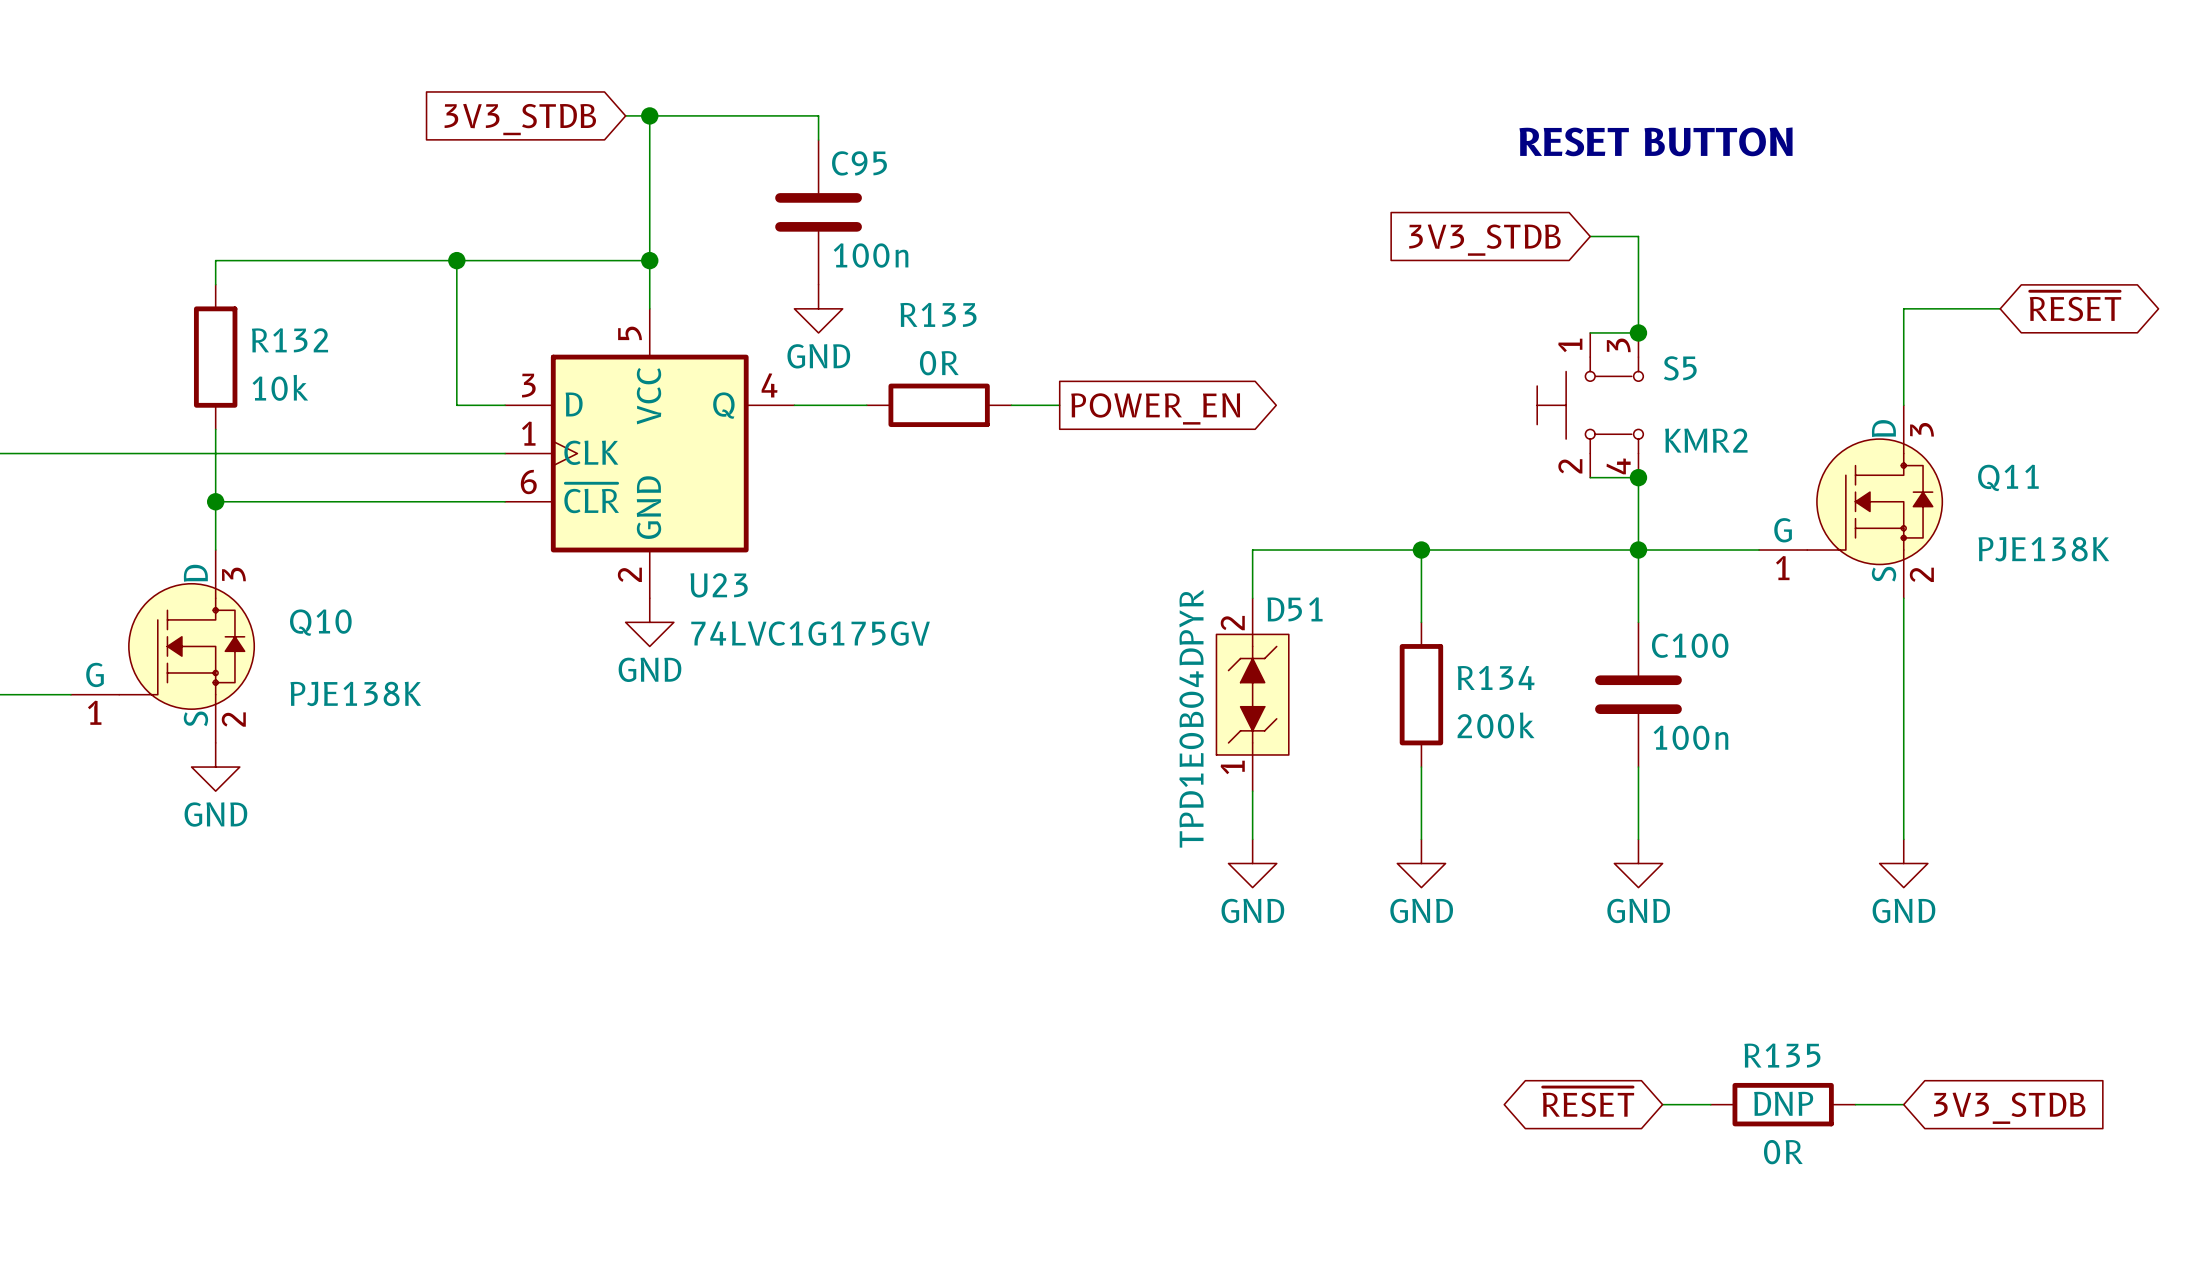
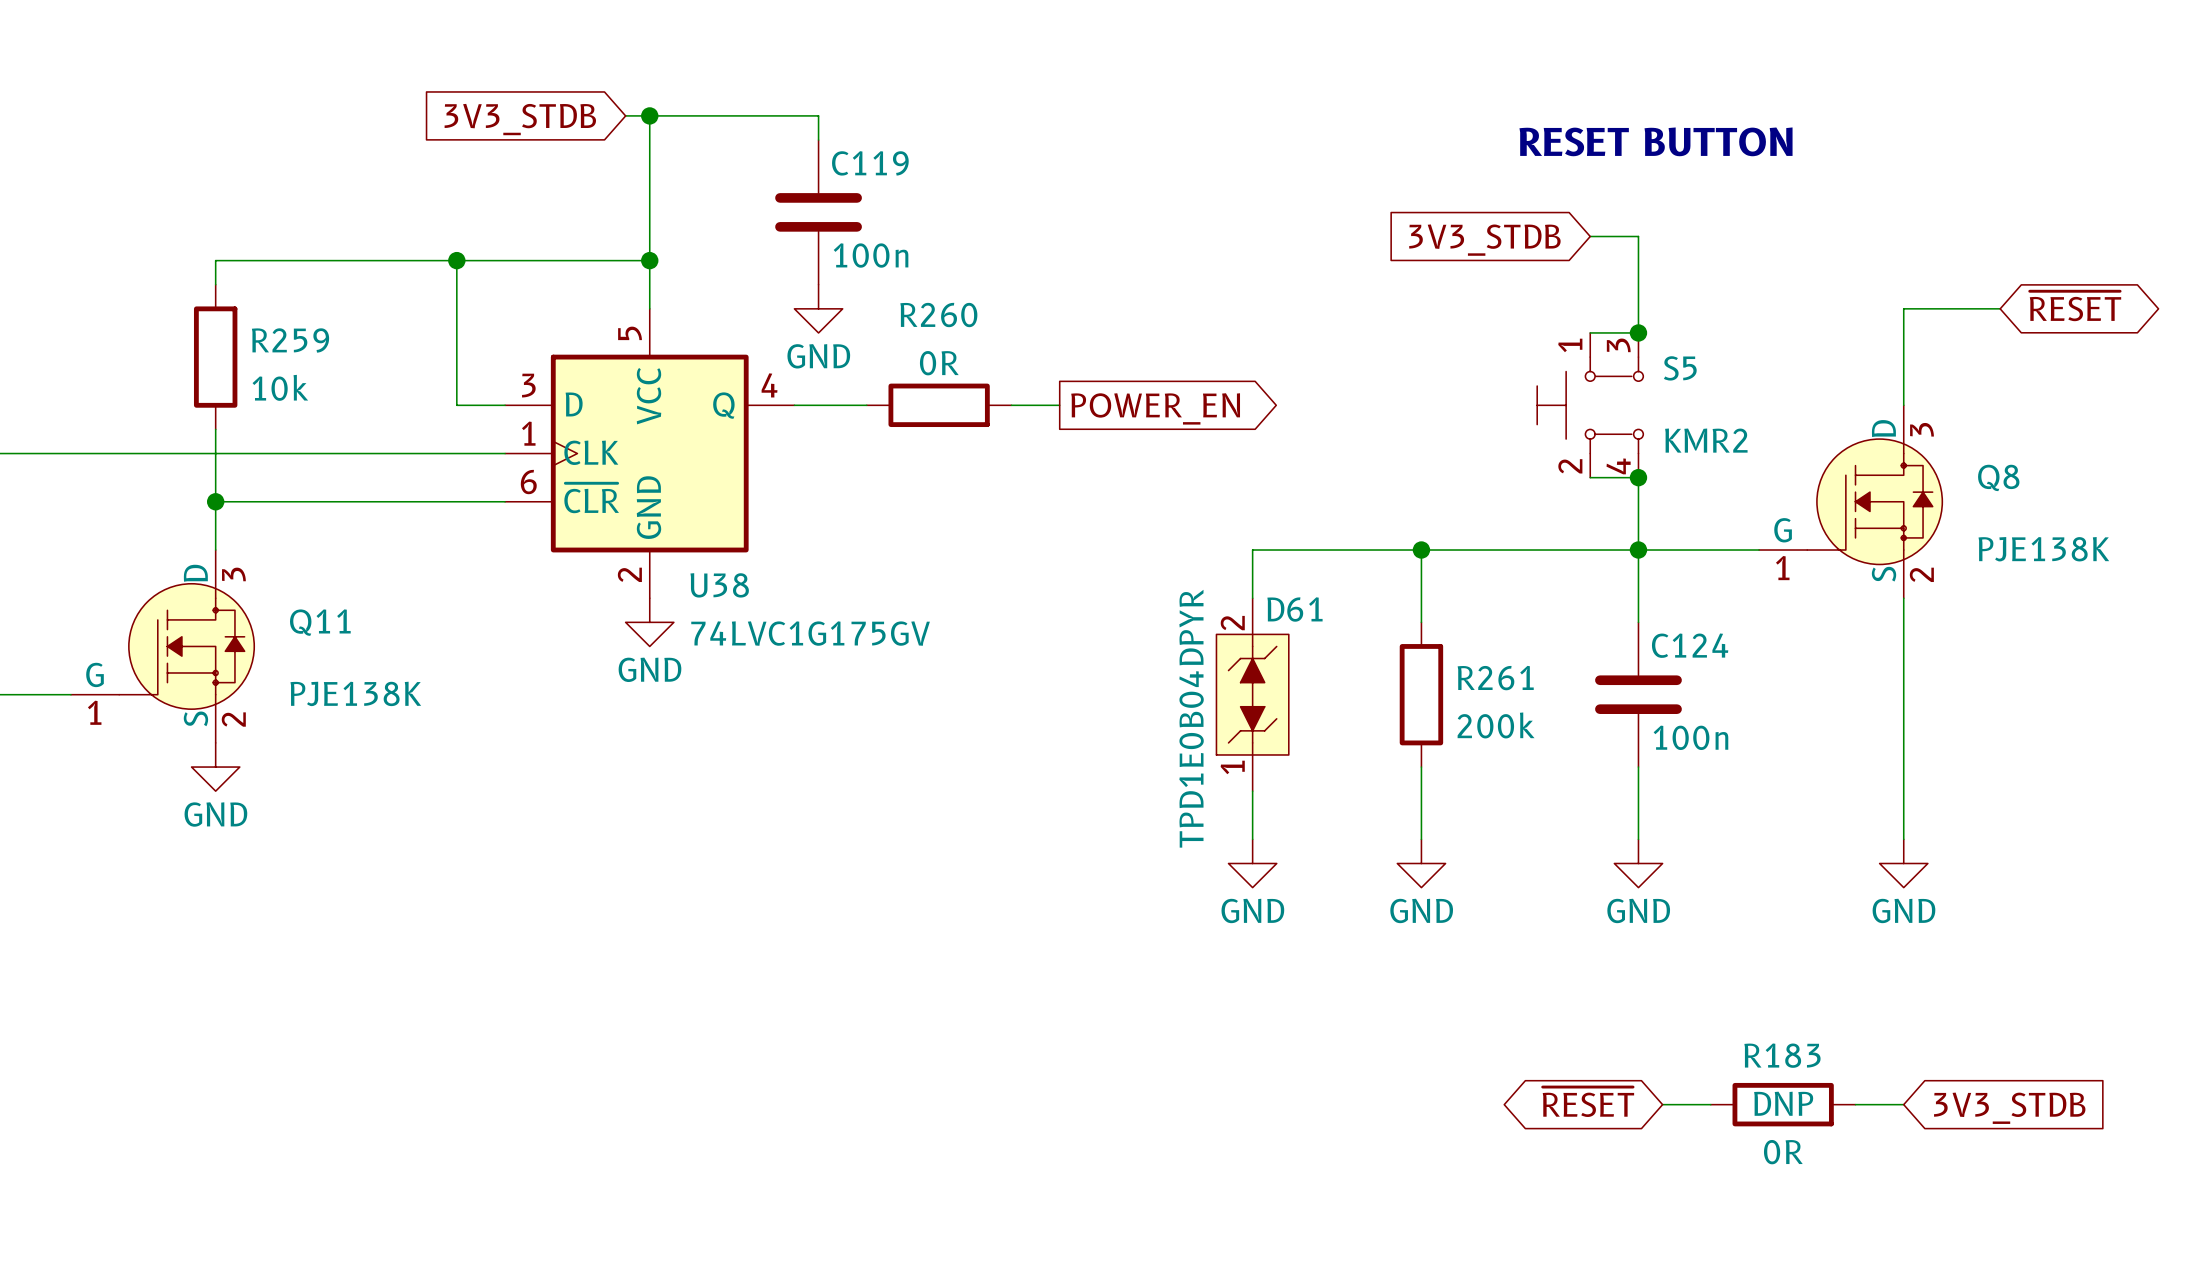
C95 name: C95 (859, 163) -> C119 (870, 163)
R133 name: R133 (938, 314) -> R260 (938, 315)
R132 name: R132 (289, 340) -> R259 (290, 340)
Q11 name: Q11 (2008, 477) -> Q8 (1998, 477)
U23 name: U23 (719, 585) -> U38 (719, 585)
D51 name: D51 (1294, 609) -> D61 (1294, 609)
Q10 name: Q10 (320, 622) -> Q11 (320, 622)
C100 name: C100 (1690, 645) -> C124 (1690, 645)
R134 name: R134 (1496, 677) -> R261 (1495, 678)
R135 name: R135 (1782, 1055) -> R183 (1782, 1055)

